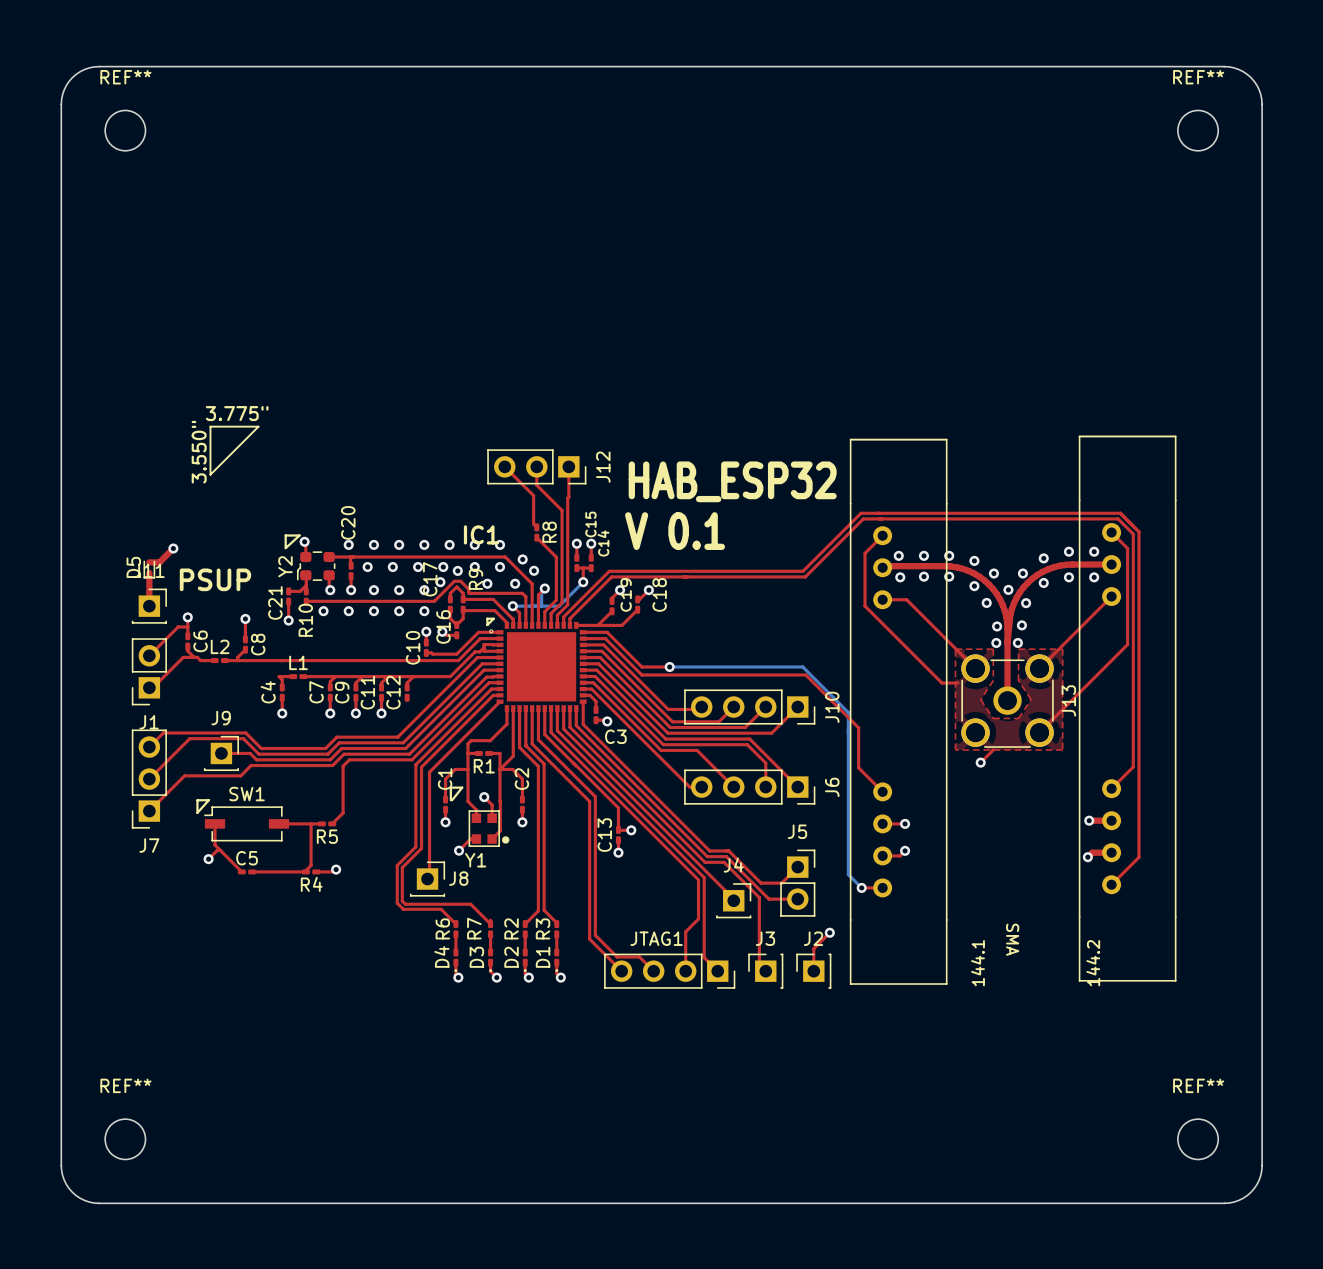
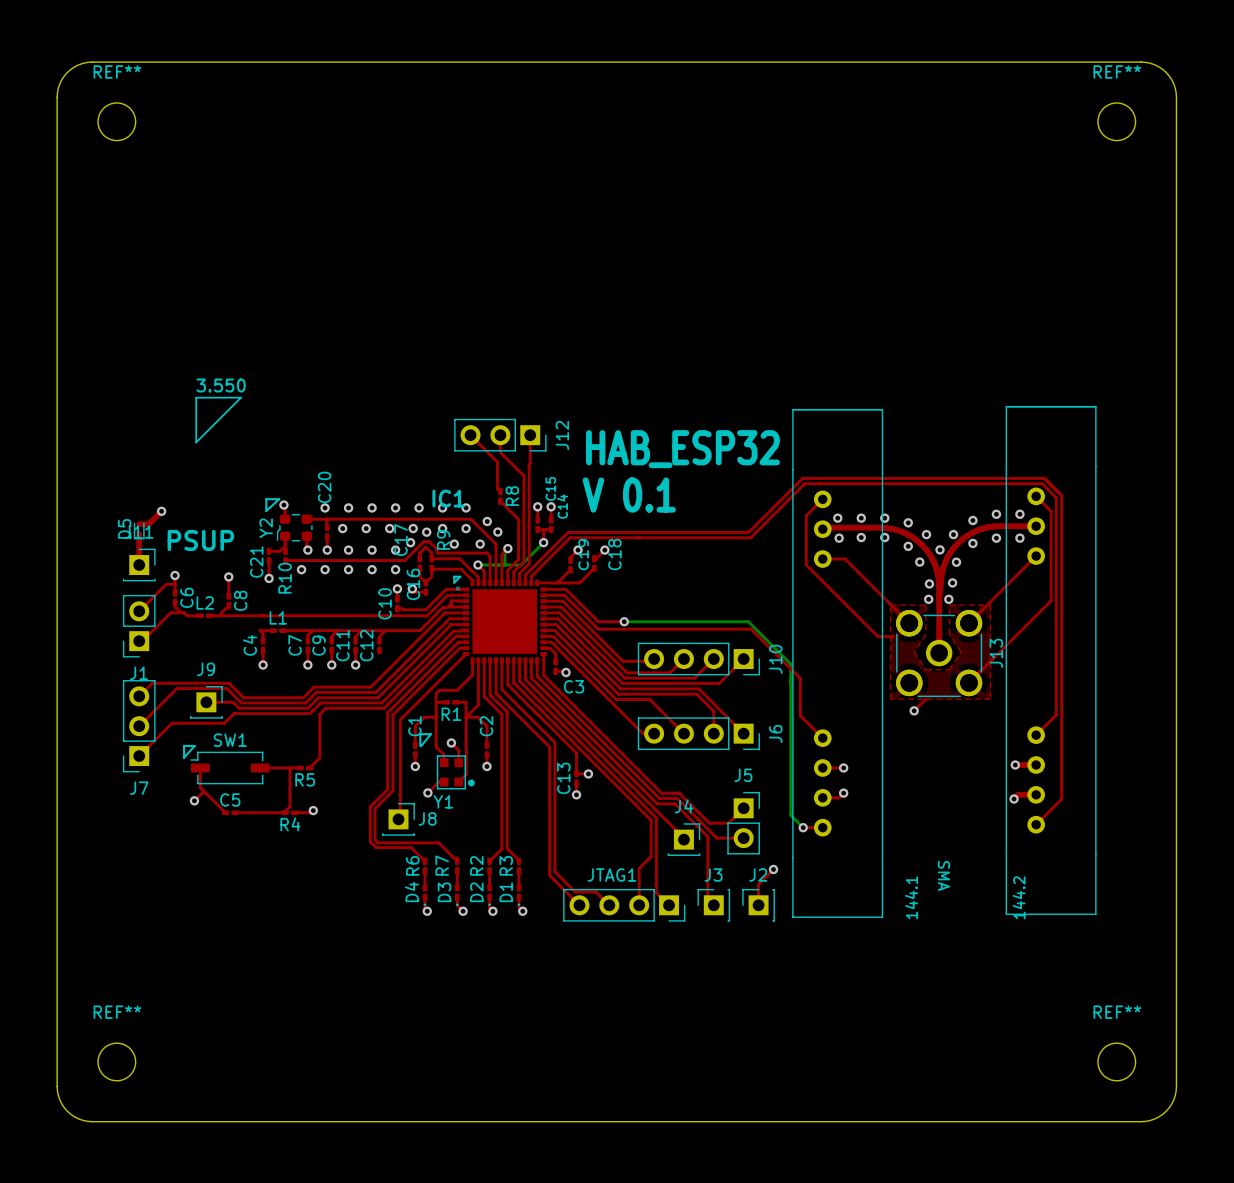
text: 3.775" (237, 413) -> 3.550 (221, 385)
text: 3.550" (199, 452) -> none

